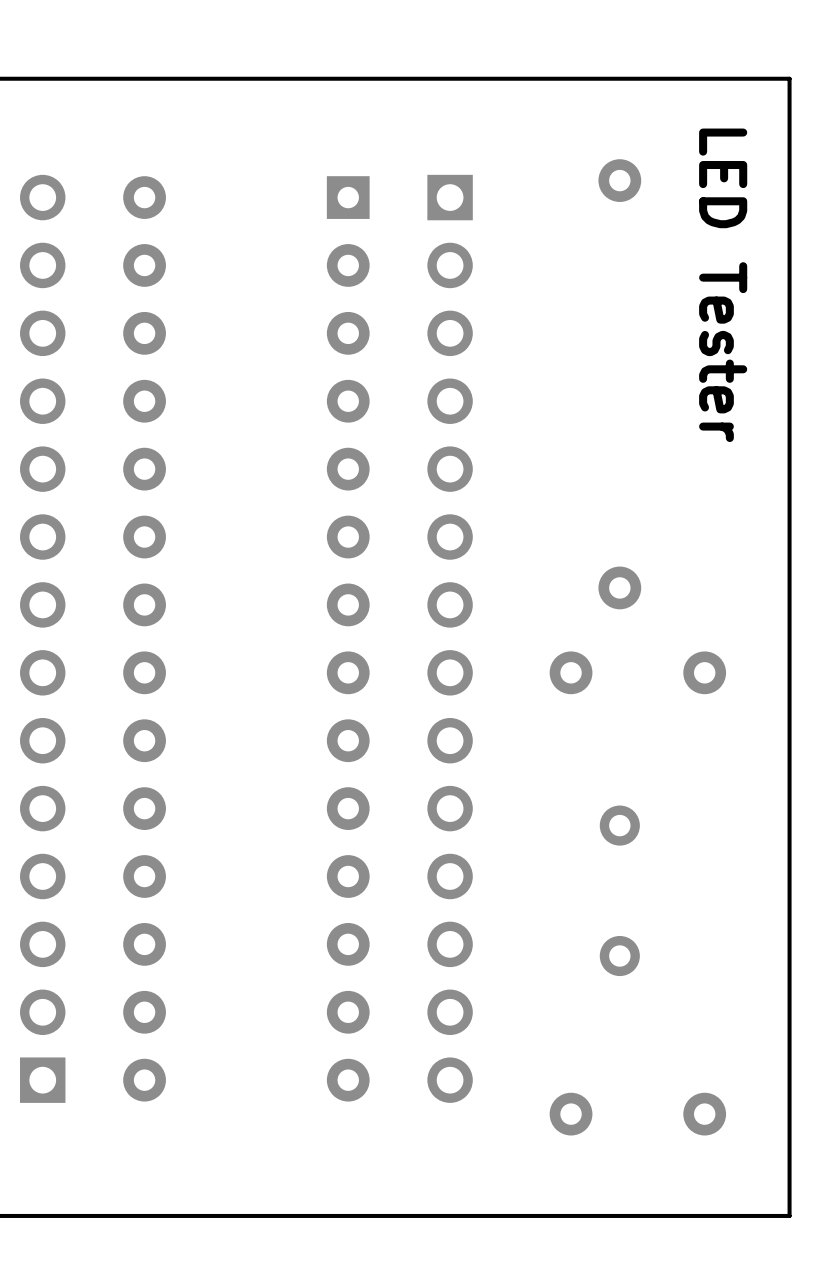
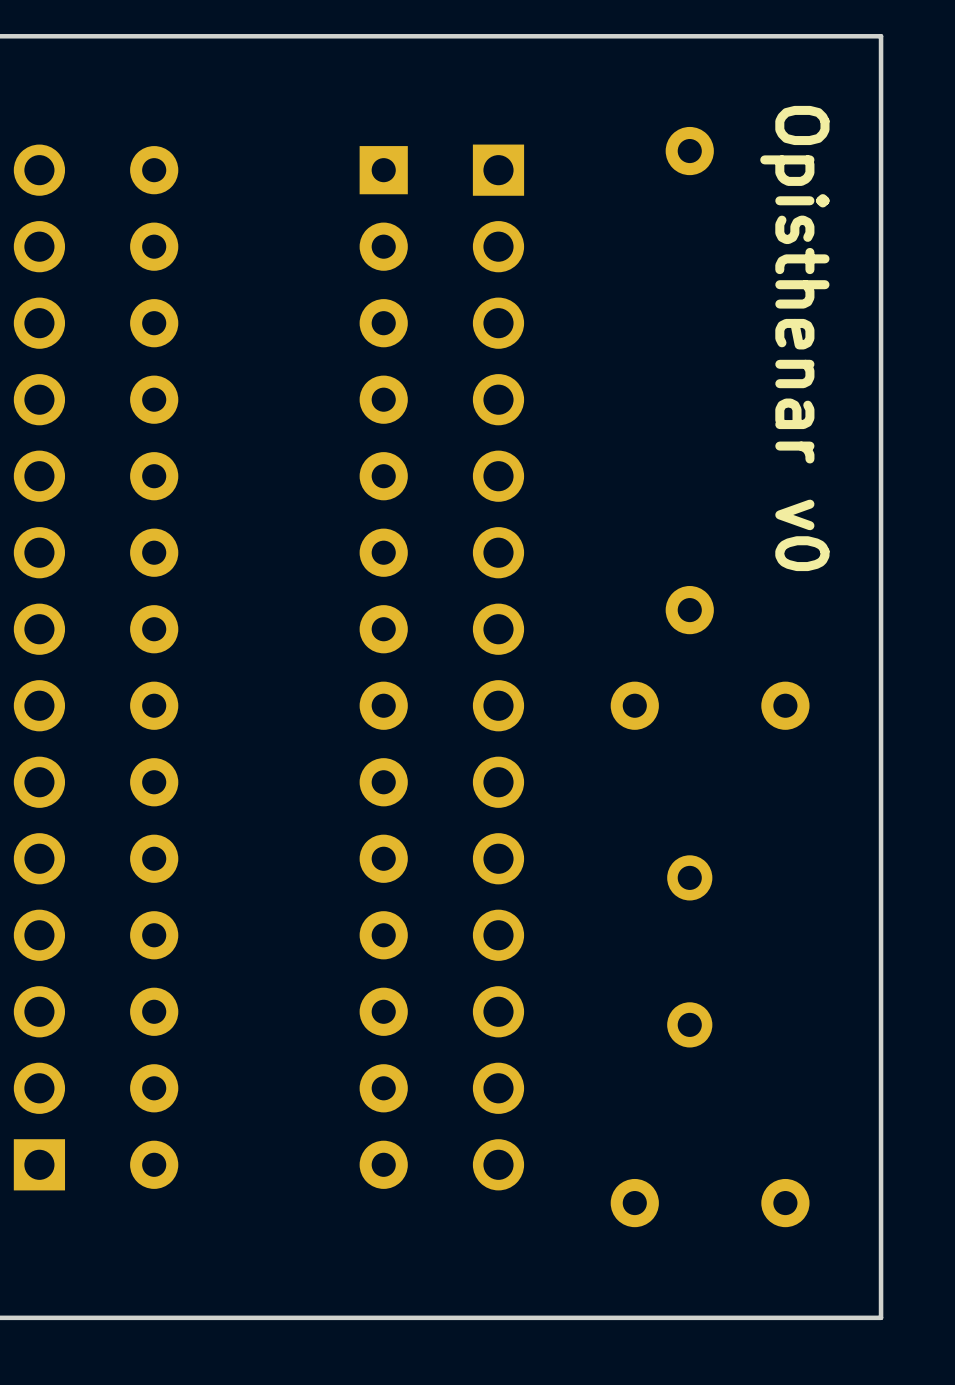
text: LED Tester (723, 285) -> none
text: none -> Opisthenar v0 (794, 338)

